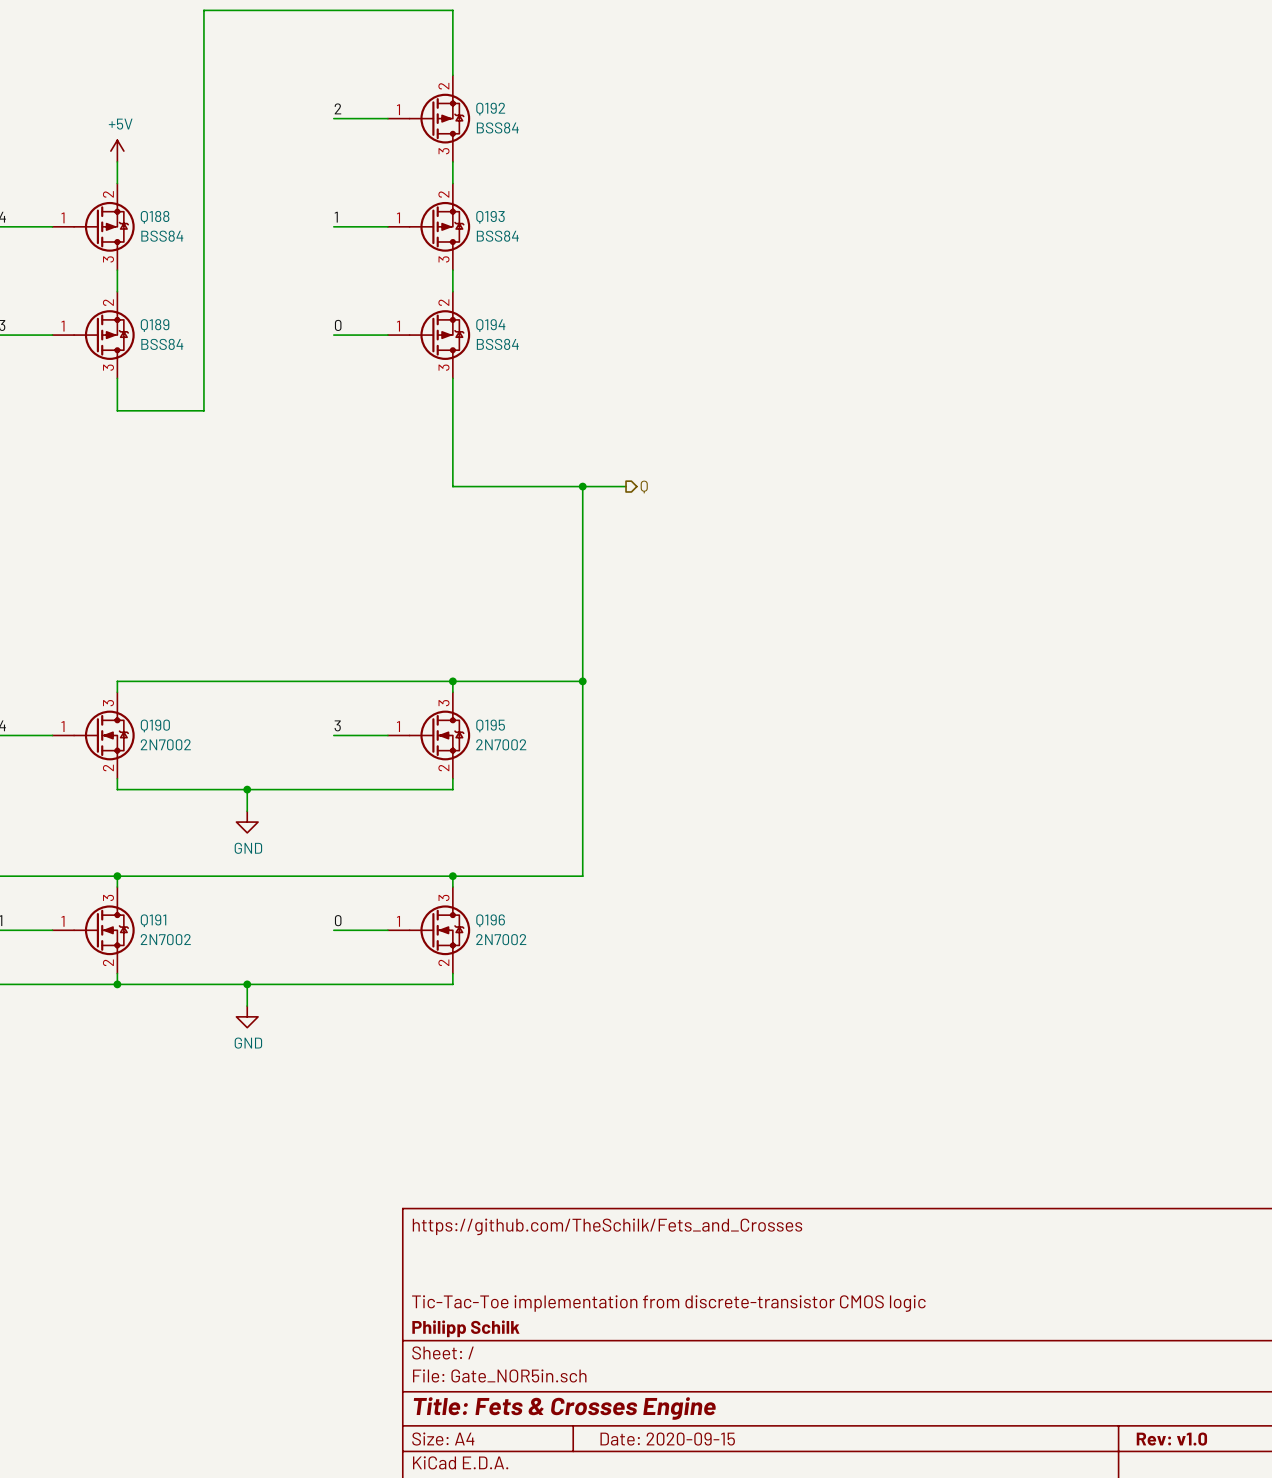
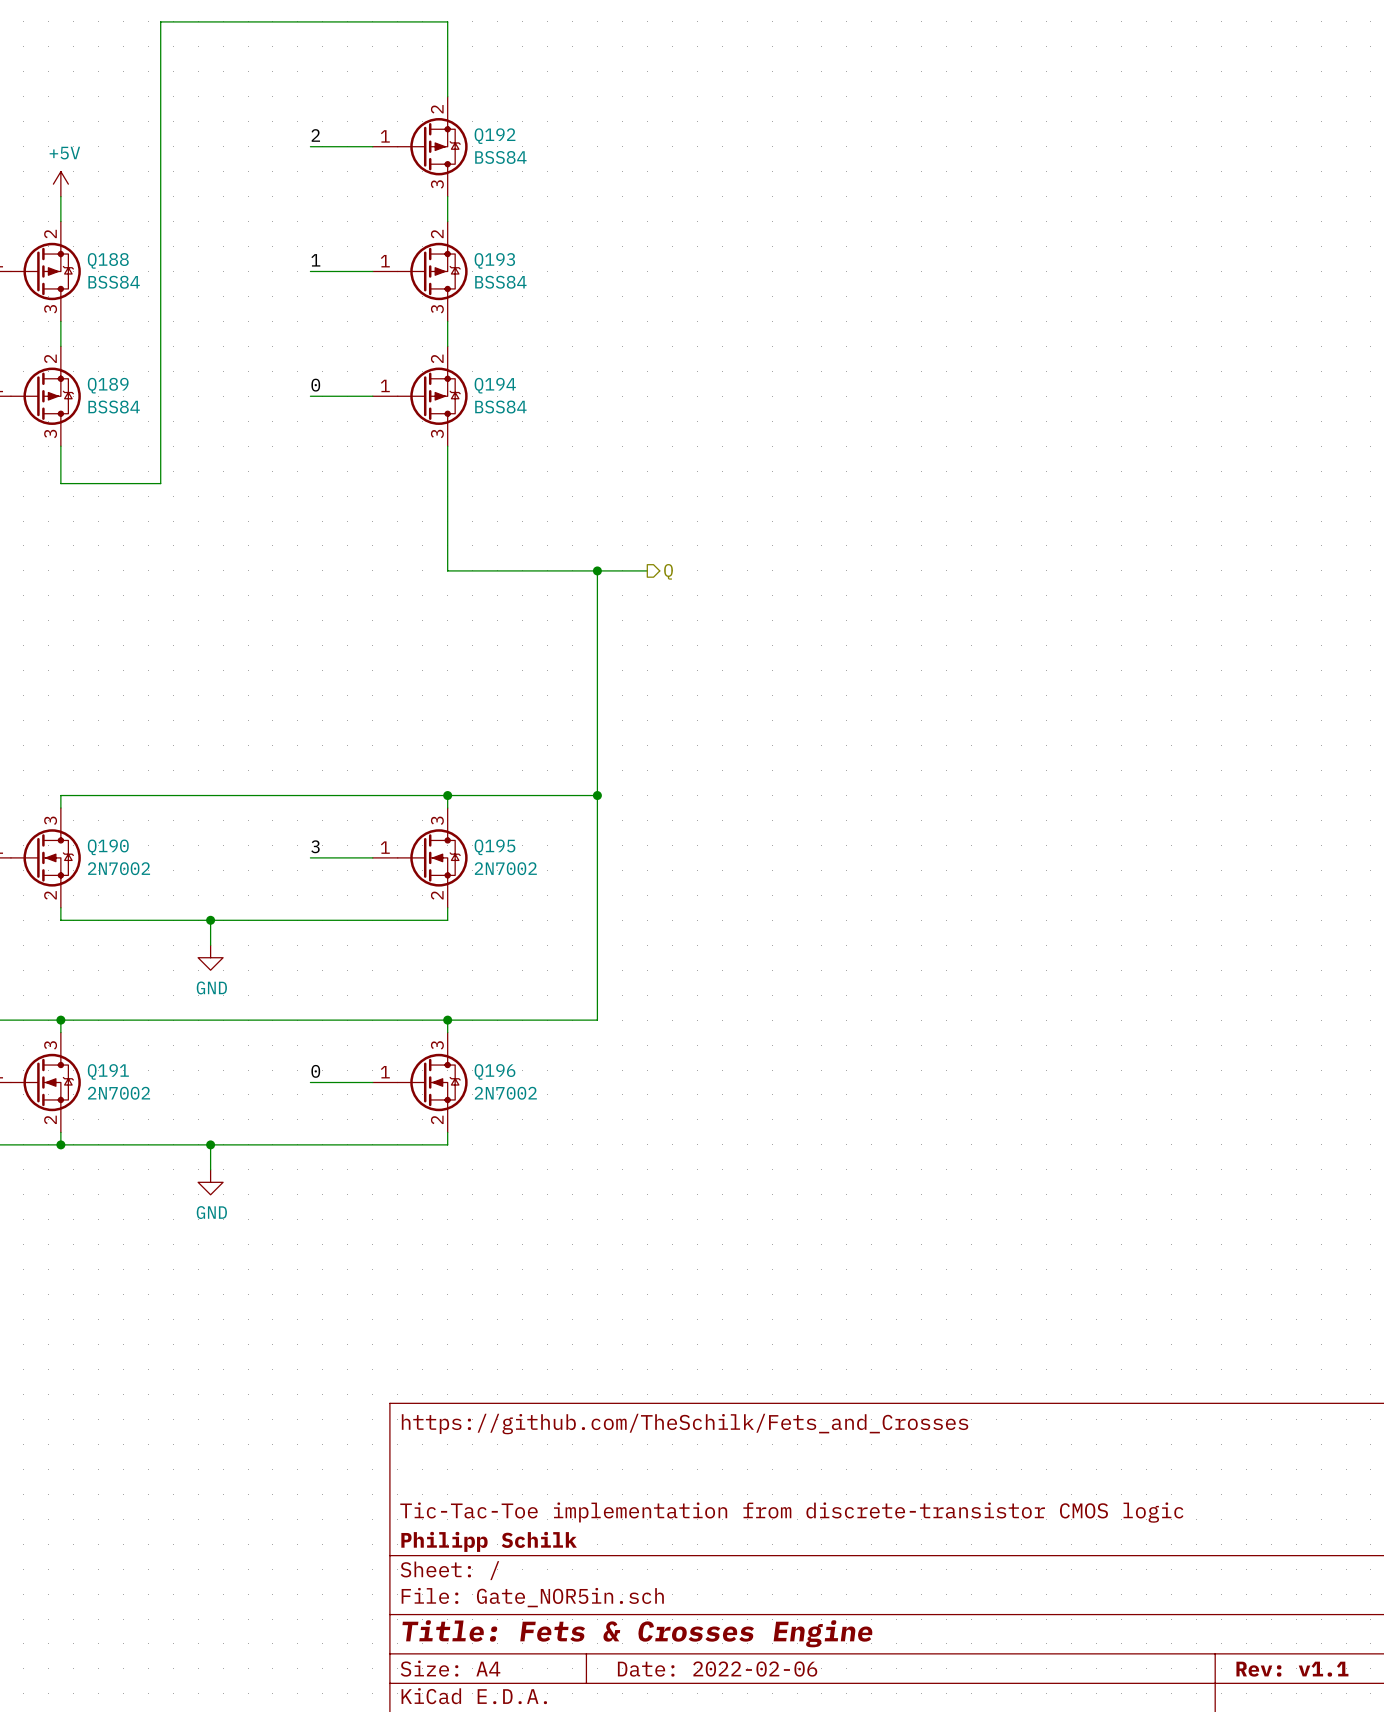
title block: Date: 2020-09-15 (667, 1439) -> Date: 2022-02-06 (717, 1669)
title block: Rev: v1.0 (1171, 1439) -> Rev: v1.1 (1292, 1669)

